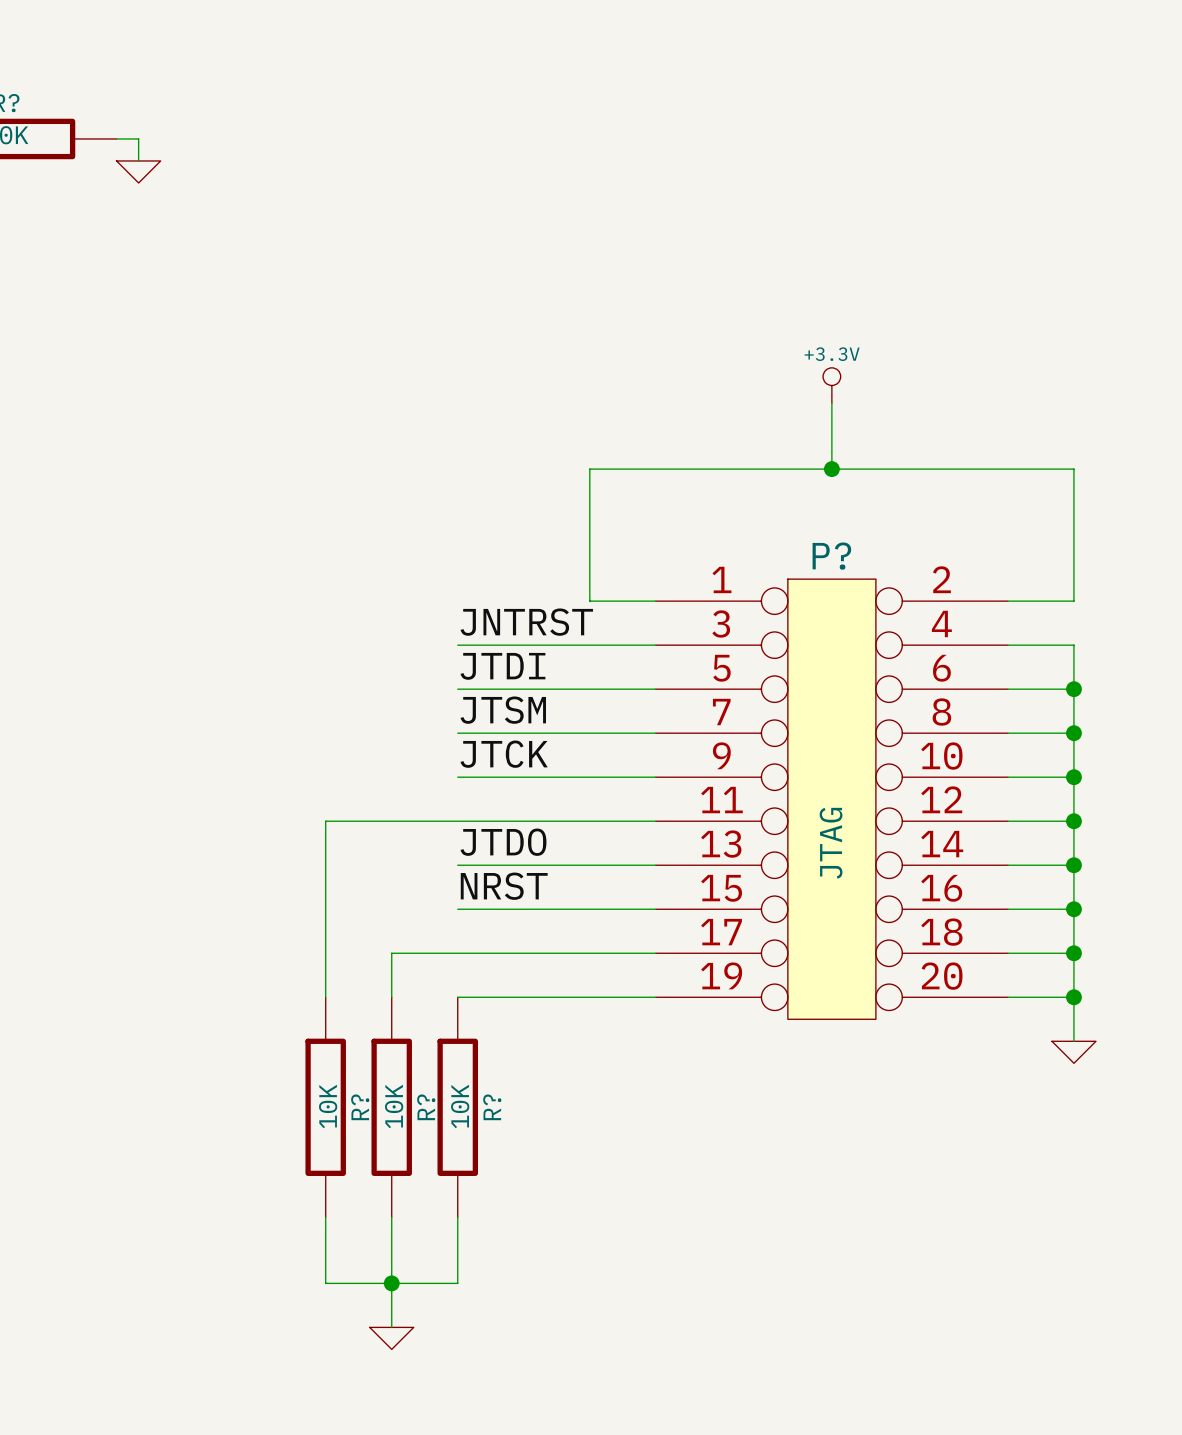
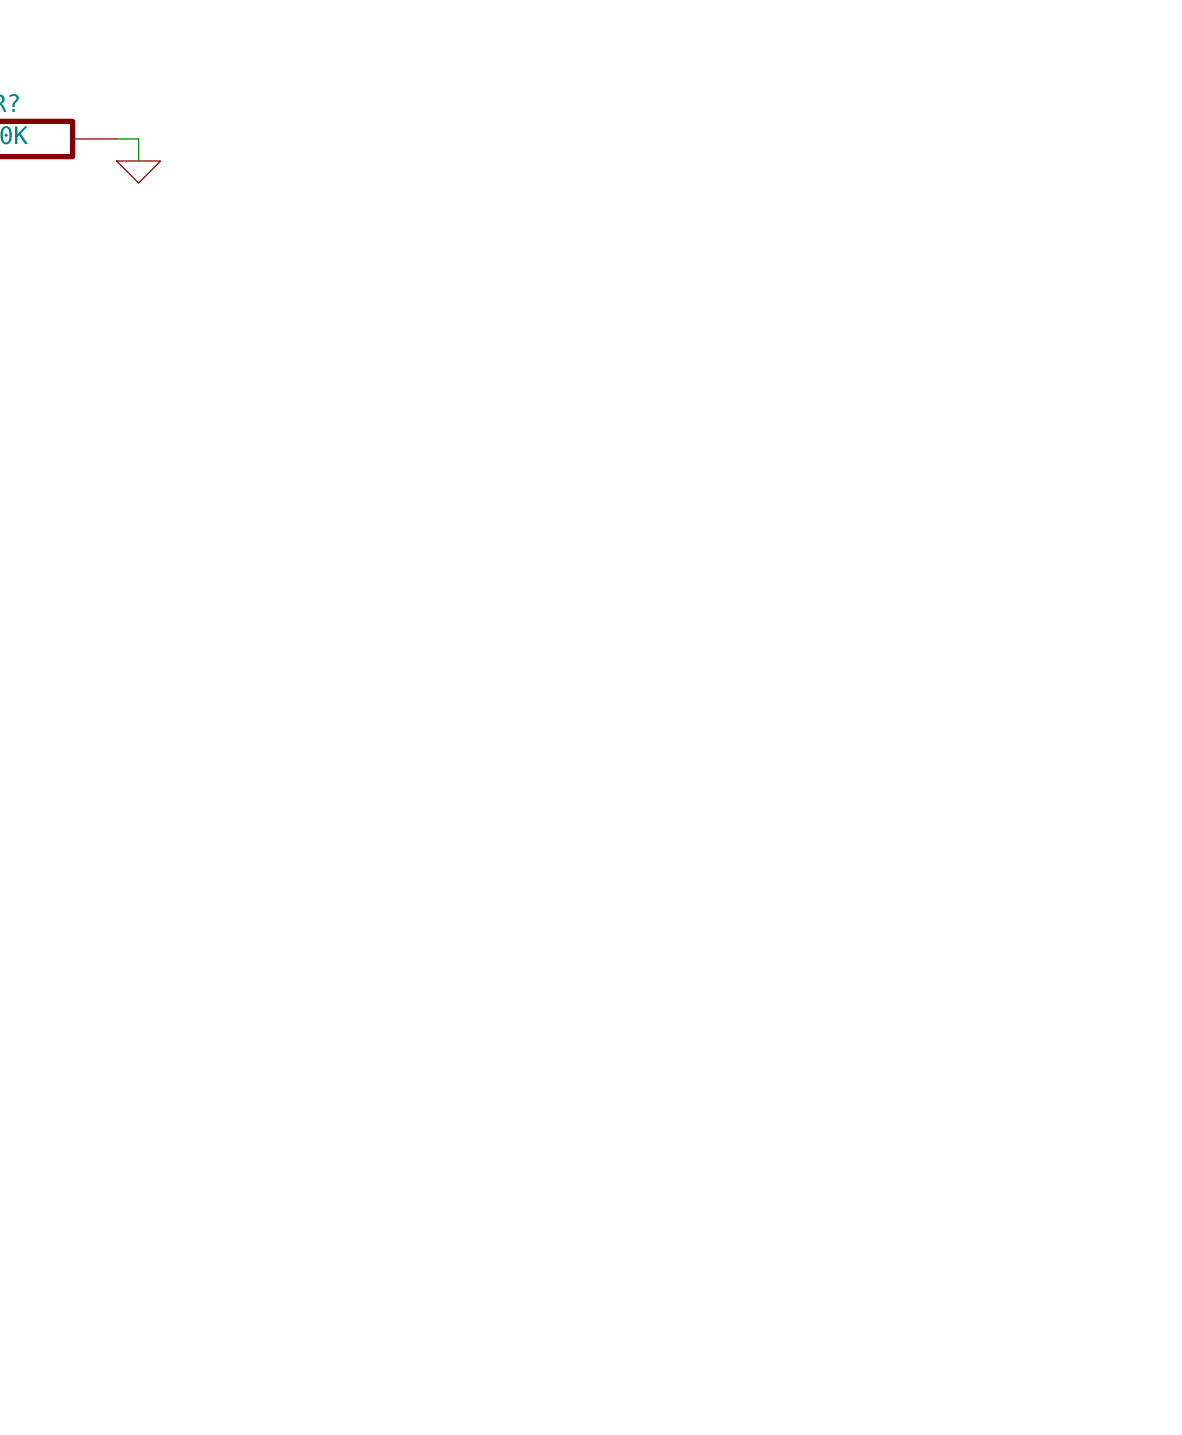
power symbol: +3.3V (831, 385) -> none
wire: (831, 403) (831, 469) -> none
junction: (831, 469) -> none
wire: (655, 601) (589, 601) (589, 469) (1073, 469) (1073, 601) (1007, 601) -> none
label: JNTRST (526, 622) -> none
wire: (457, 645) (655, 645) -> none
wire: (1007, 645) (1073, 645) (1073, 1041) -> none
label: JTDI (502, 666) -> none
wire: (457, 689) (655, 689) -> none
wire: (1007, 689) (1073, 689) -> none
junction: (1073, 689) -> none
label: JTSM (503, 710) -> none
wire: (457, 733) (655, 733) -> none
wire: (1007, 733) (1073, 733) -> none
junction: (1073, 733) -> none
label: JTCK (504, 754) -> none
wire: (457, 777) (655, 777) -> none
wire: (1007, 777) (1073, 777) -> none
junction: (1073, 777) -> none
P?: JTAG (831, 799) -> none
wire: (655, 821) (325, 821) (325, 997) -> none
wire: (1007, 821) (1073, 821) -> none
junction: (1073, 821) -> none
label: JTDO (503, 842) -> none
wire: (457, 865) (655, 865) -> none
wire: (1007, 865) (1073, 865) -> none
junction: (1073, 865) -> none
label: NRST (504, 886) -> none
wire: (457, 909) (655, 909) -> none
wire: (1007, 909) (1073, 909) -> none
junction: (1073, 909) -> none
wire: (655, 953) (391, 953) (391, 997) -> none
wire: (1007, 953) (1073, 953) -> none
junction: (1073, 953) -> none
wire: (457, 997) (655, 997) -> none
wire: (1007, 997) (1073, 997) -> none
junction: (1073, 997) -> none
power symbol: (1073, 1052) -> none
R?: 10K (325, 1107) -> none
R?: 10K (391, 1107) -> none
R?: 10K (457, 1107) -> none
wire: (325, 1217) (325, 1283) (457, 1283) (457, 1217) -> none
wire: (391, 1217) (391, 1327) -> none
junction: (391, 1283) -> none
power symbol: (391, 1338) -> none

